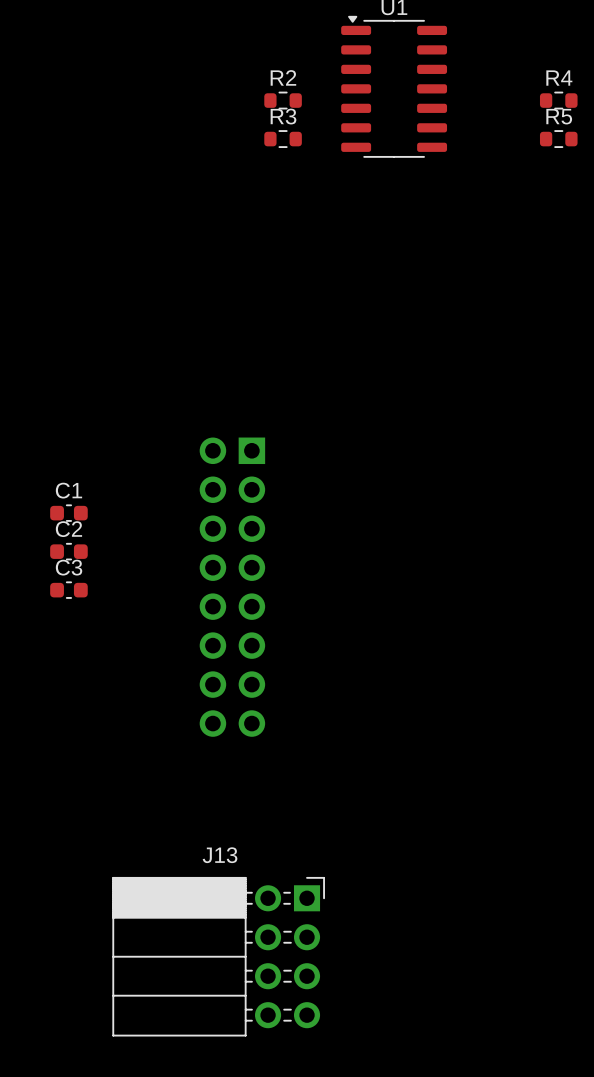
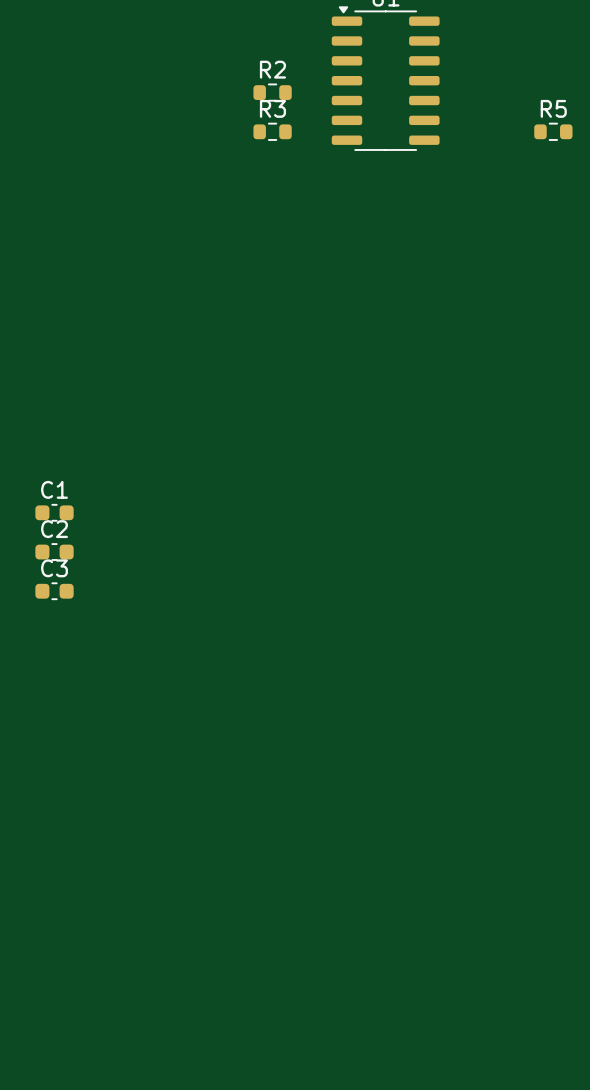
R4: (558, 100) -> none
part: (232, 587) -> none
J13: (218, 956) -> none

